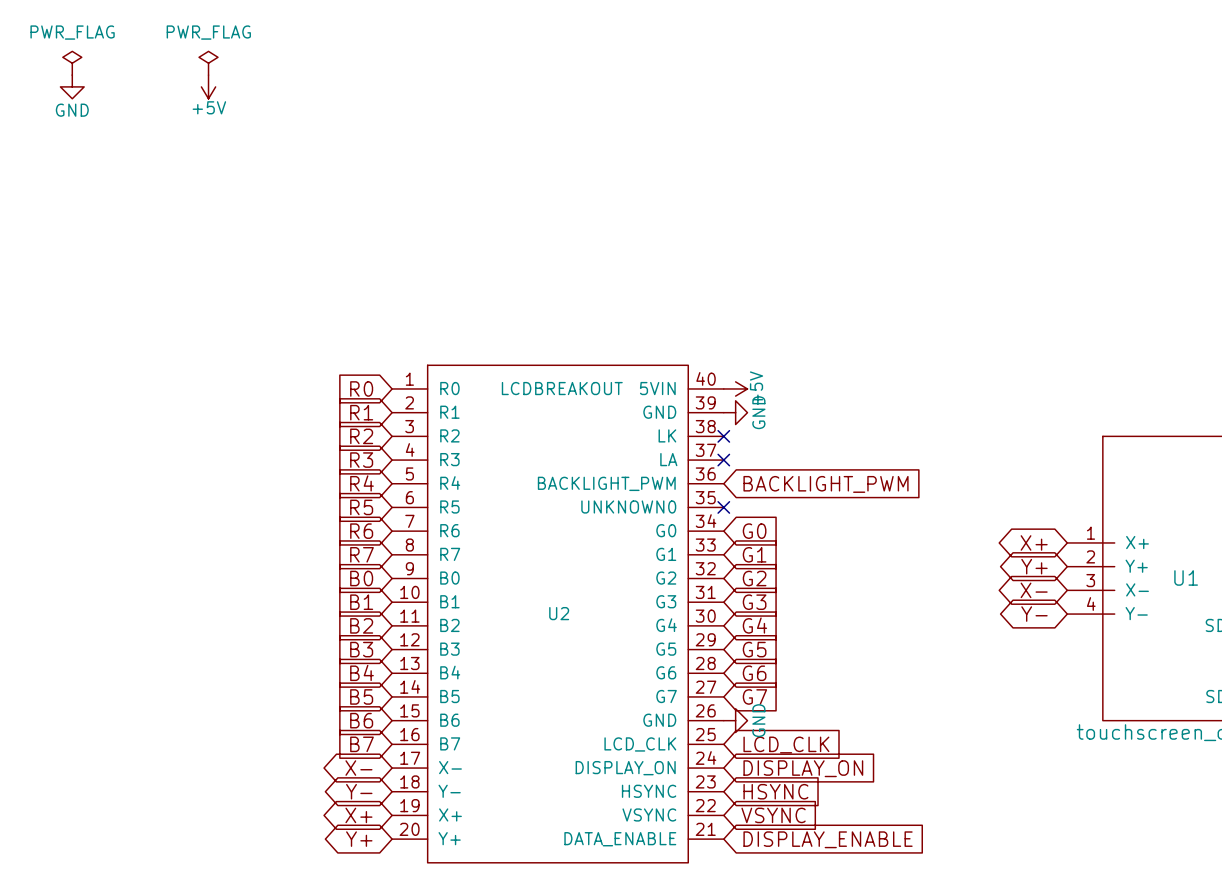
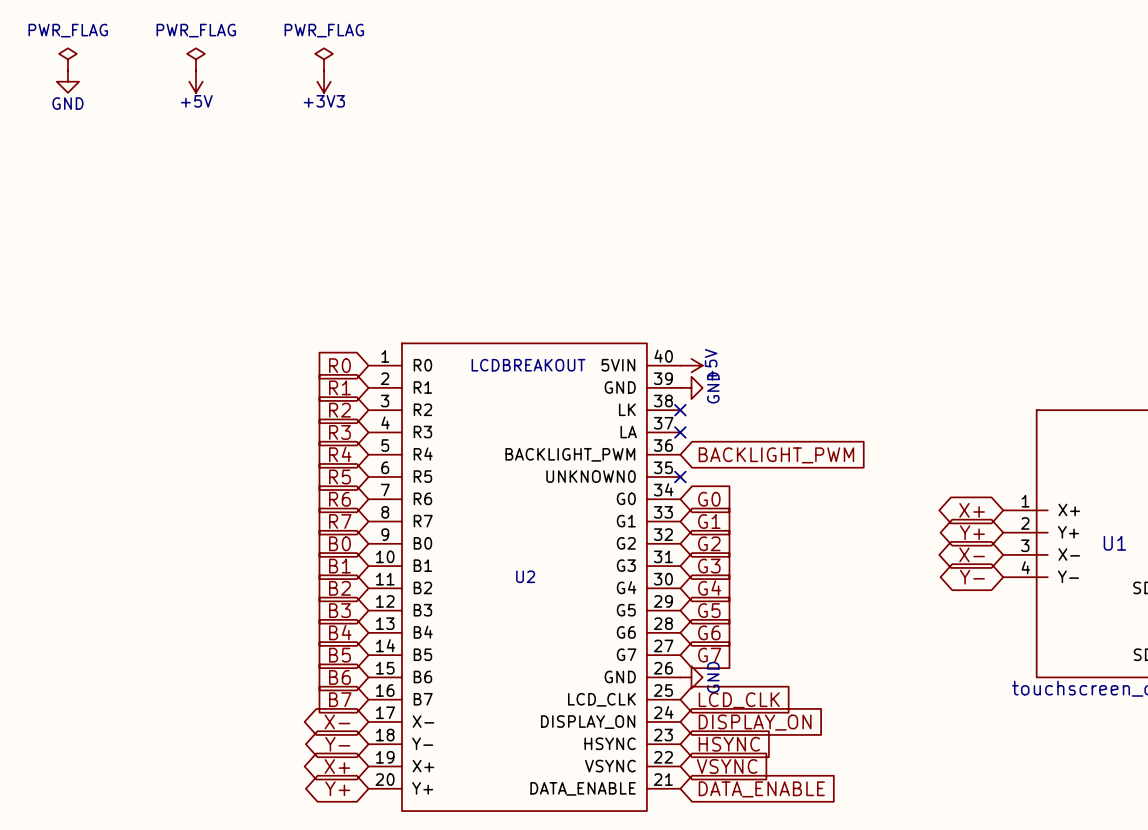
power symbol: none -> PWR_FLAG (324, 59)
power symbol: none -> +3V3 (324, 81)
global label: DISPLAY_ENABLE (828, 839) -> DATA_ENABLE (761, 789)

